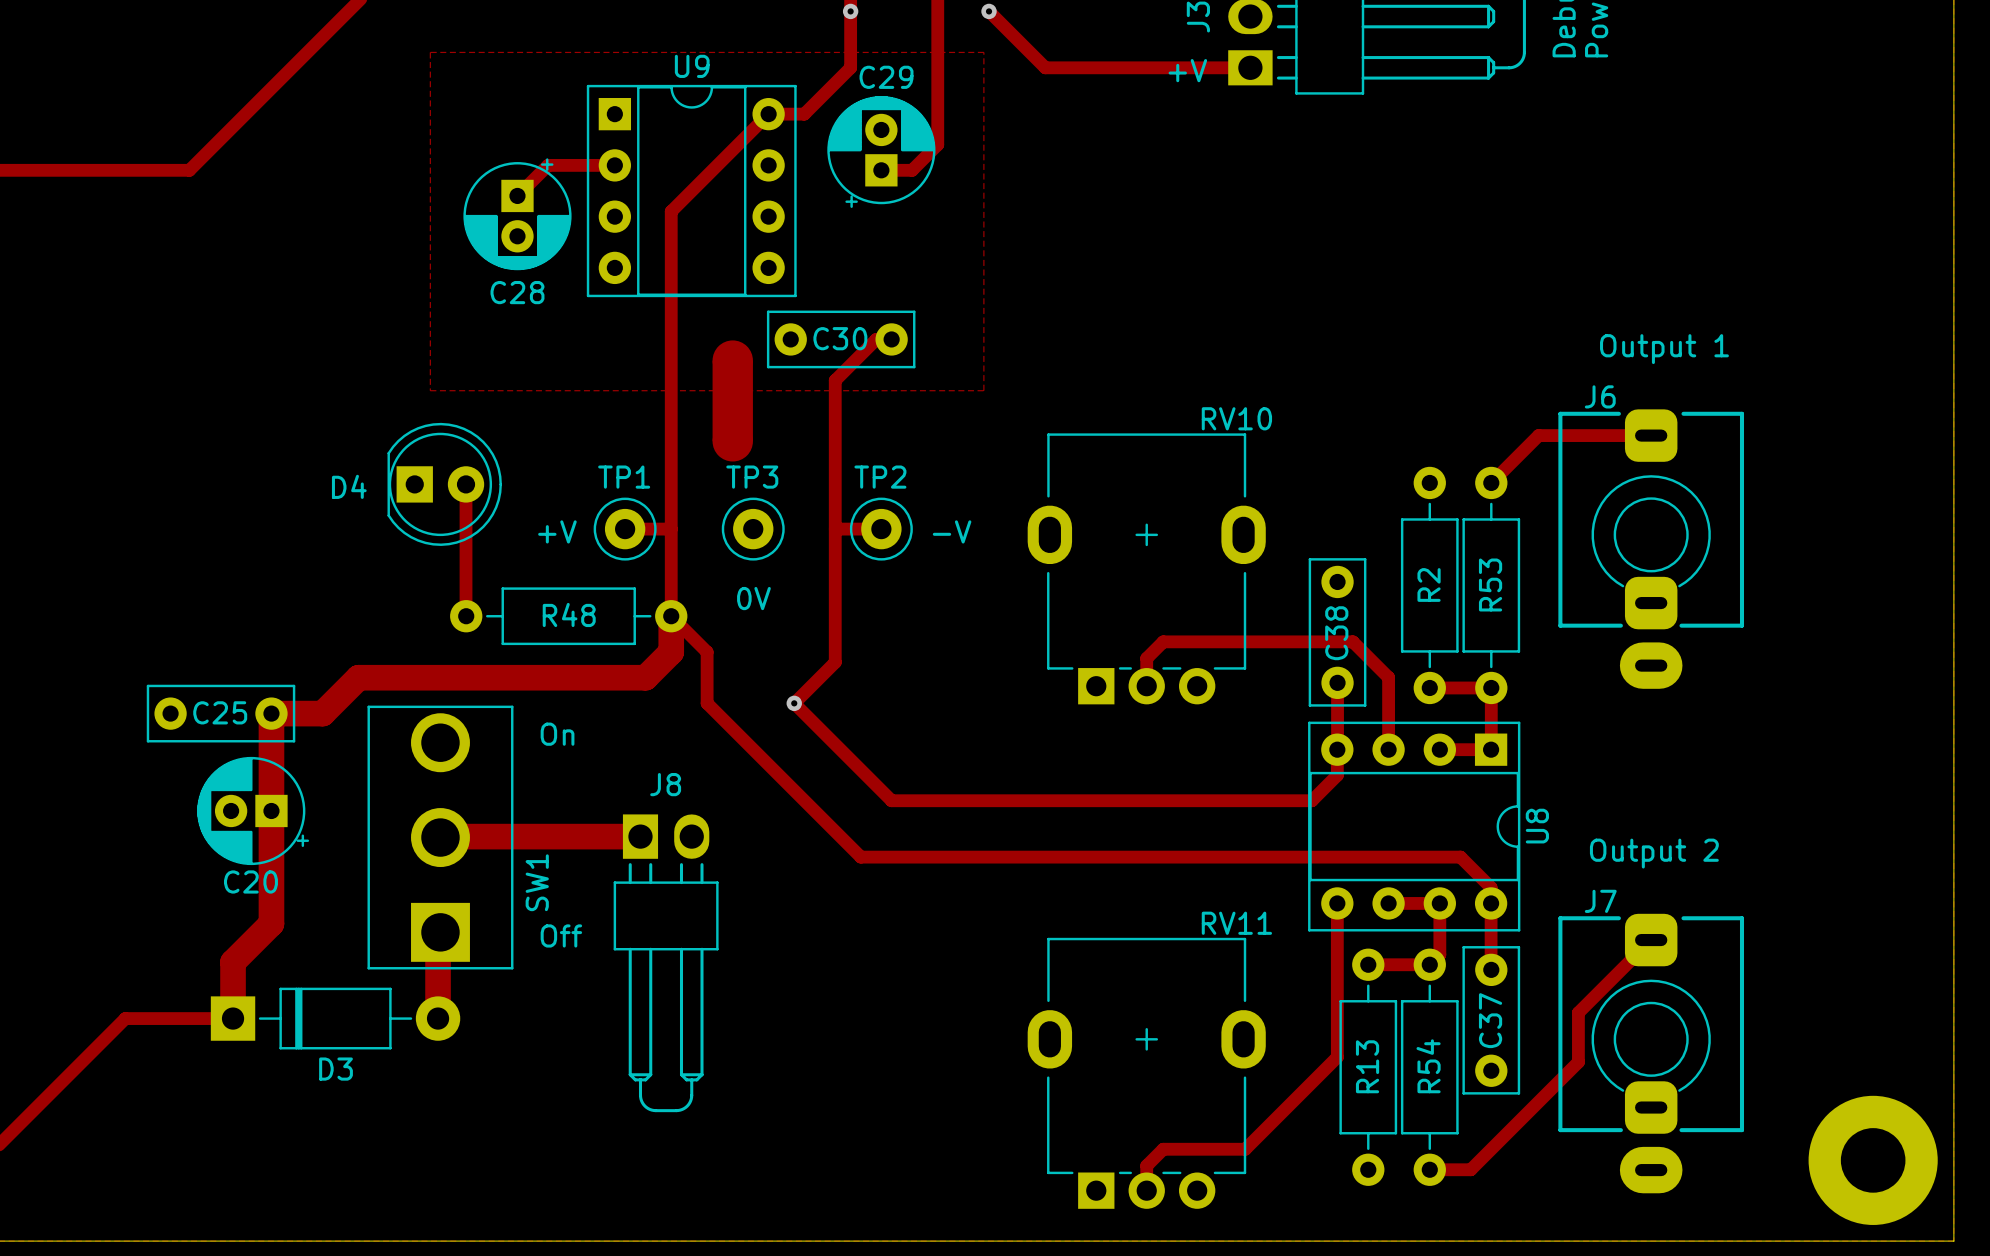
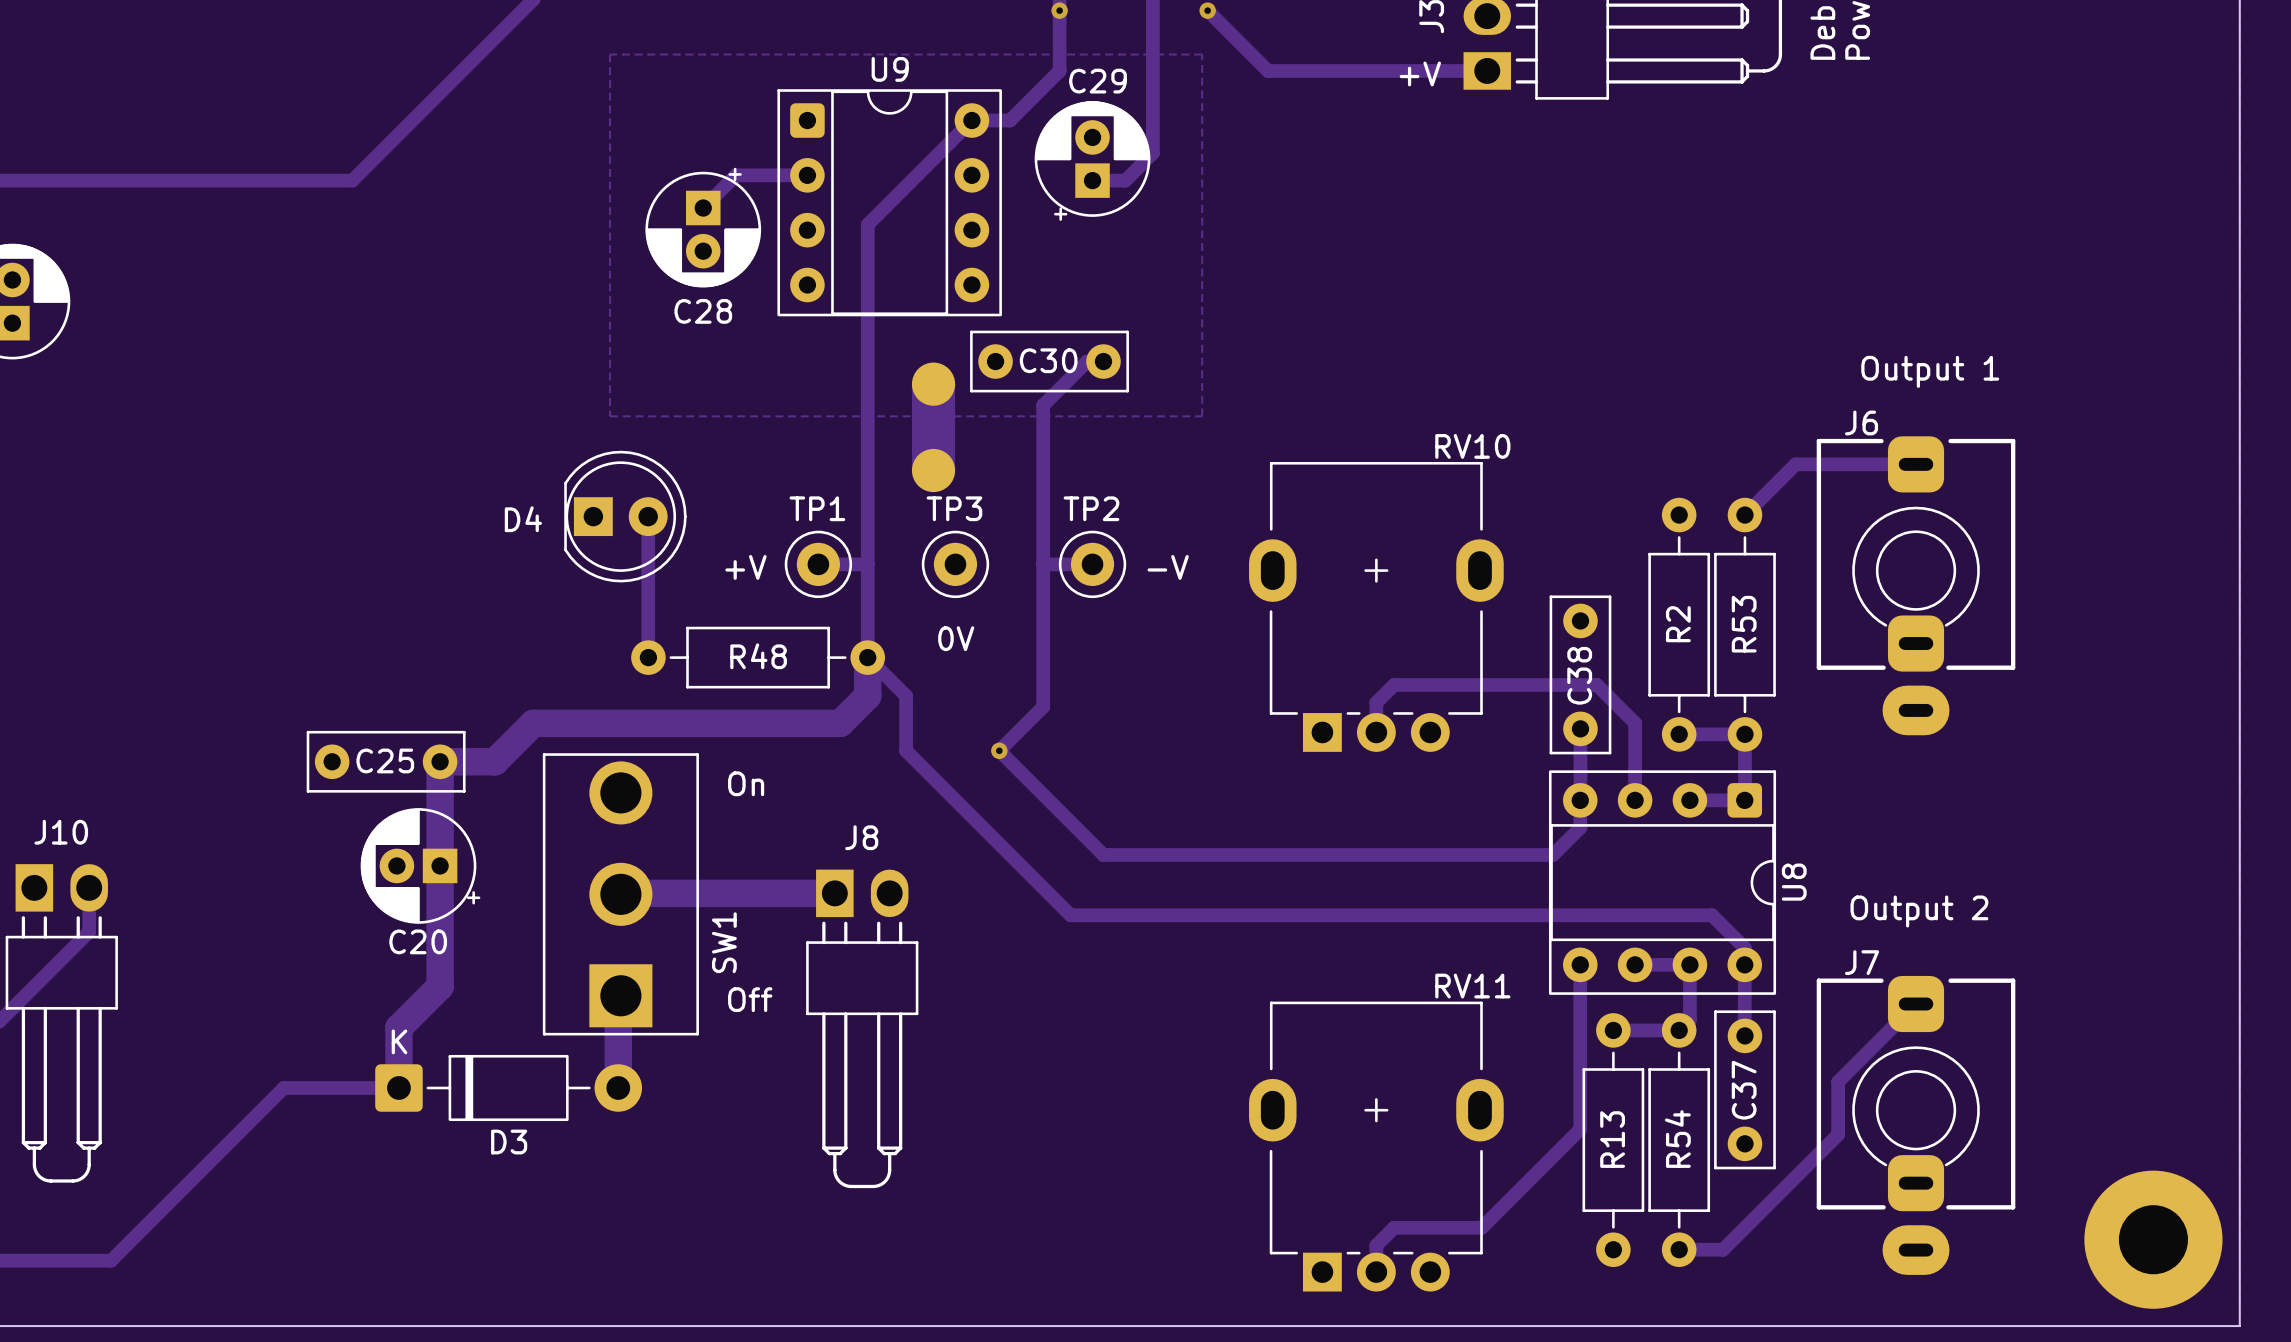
U9 footprint: [586, 84, 797, 298] -> [777, 89, 1002, 317]
U8 footprint: [1308, 721, 1521, 932] -> [1548, 770, 1777, 995]
D3 footprint: [210, 987, 461, 1050] -> [375, 1054, 643, 1122]

